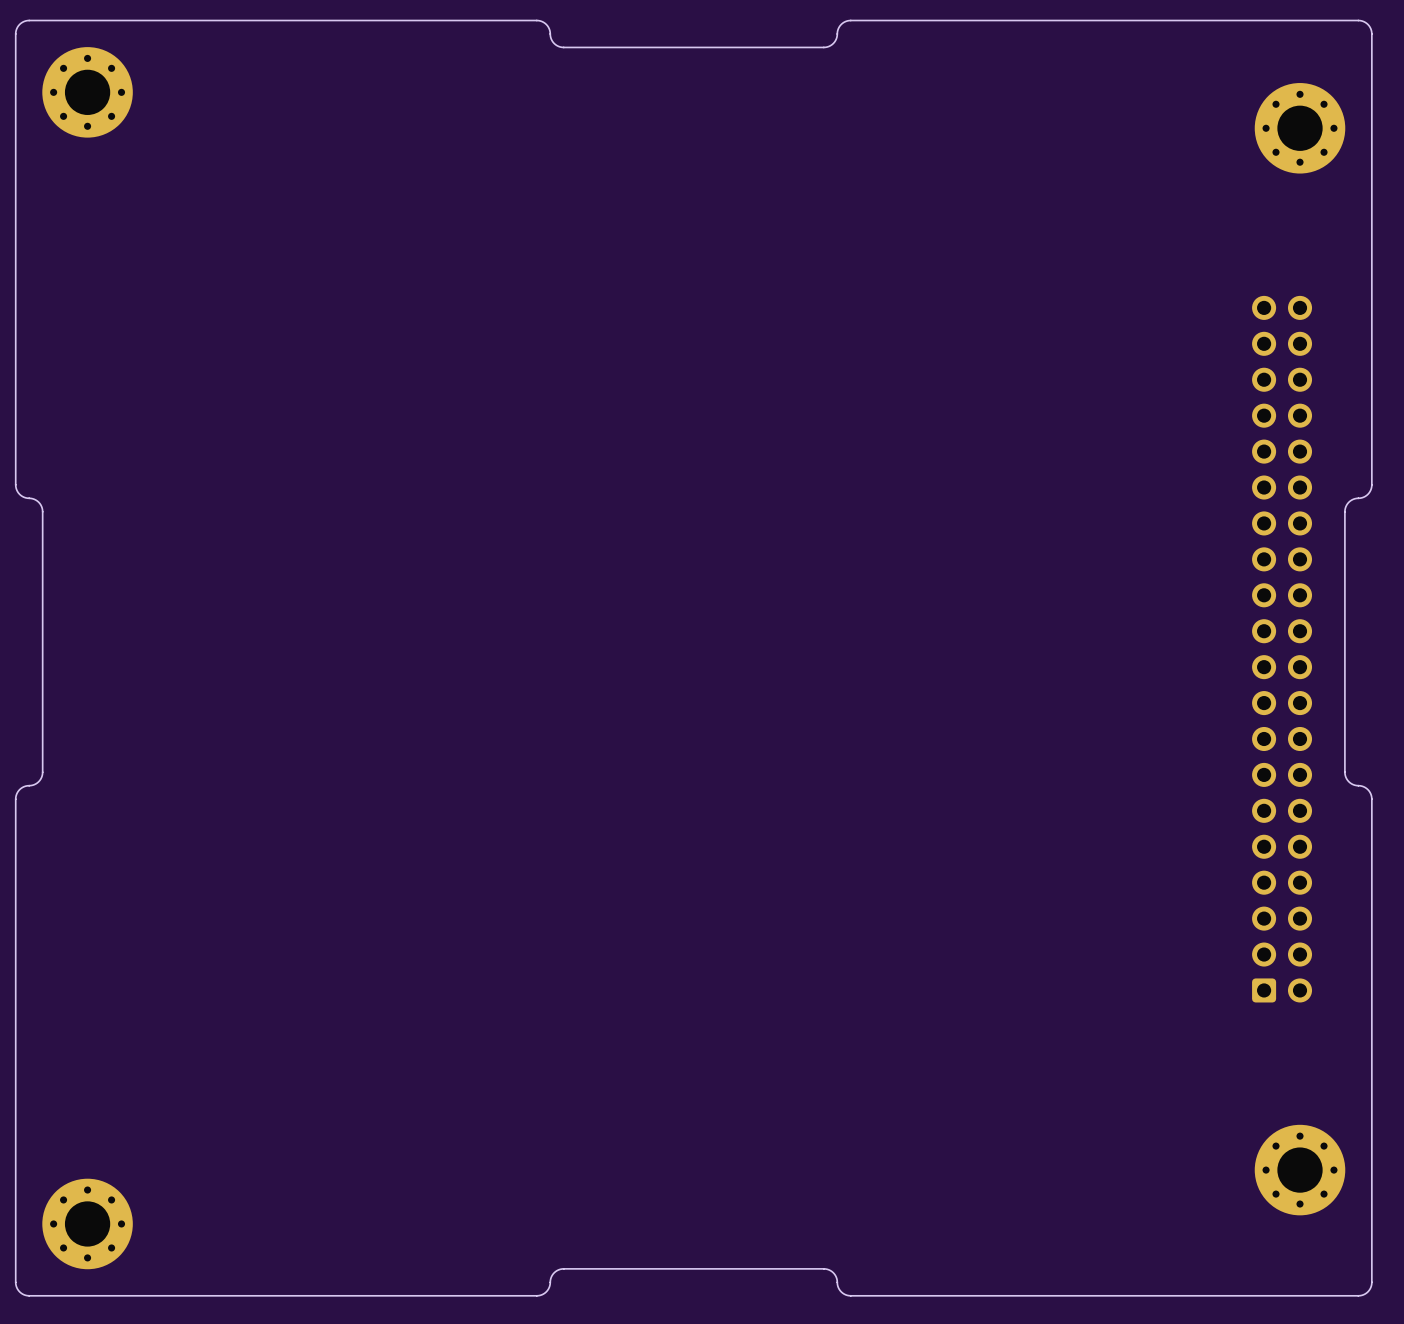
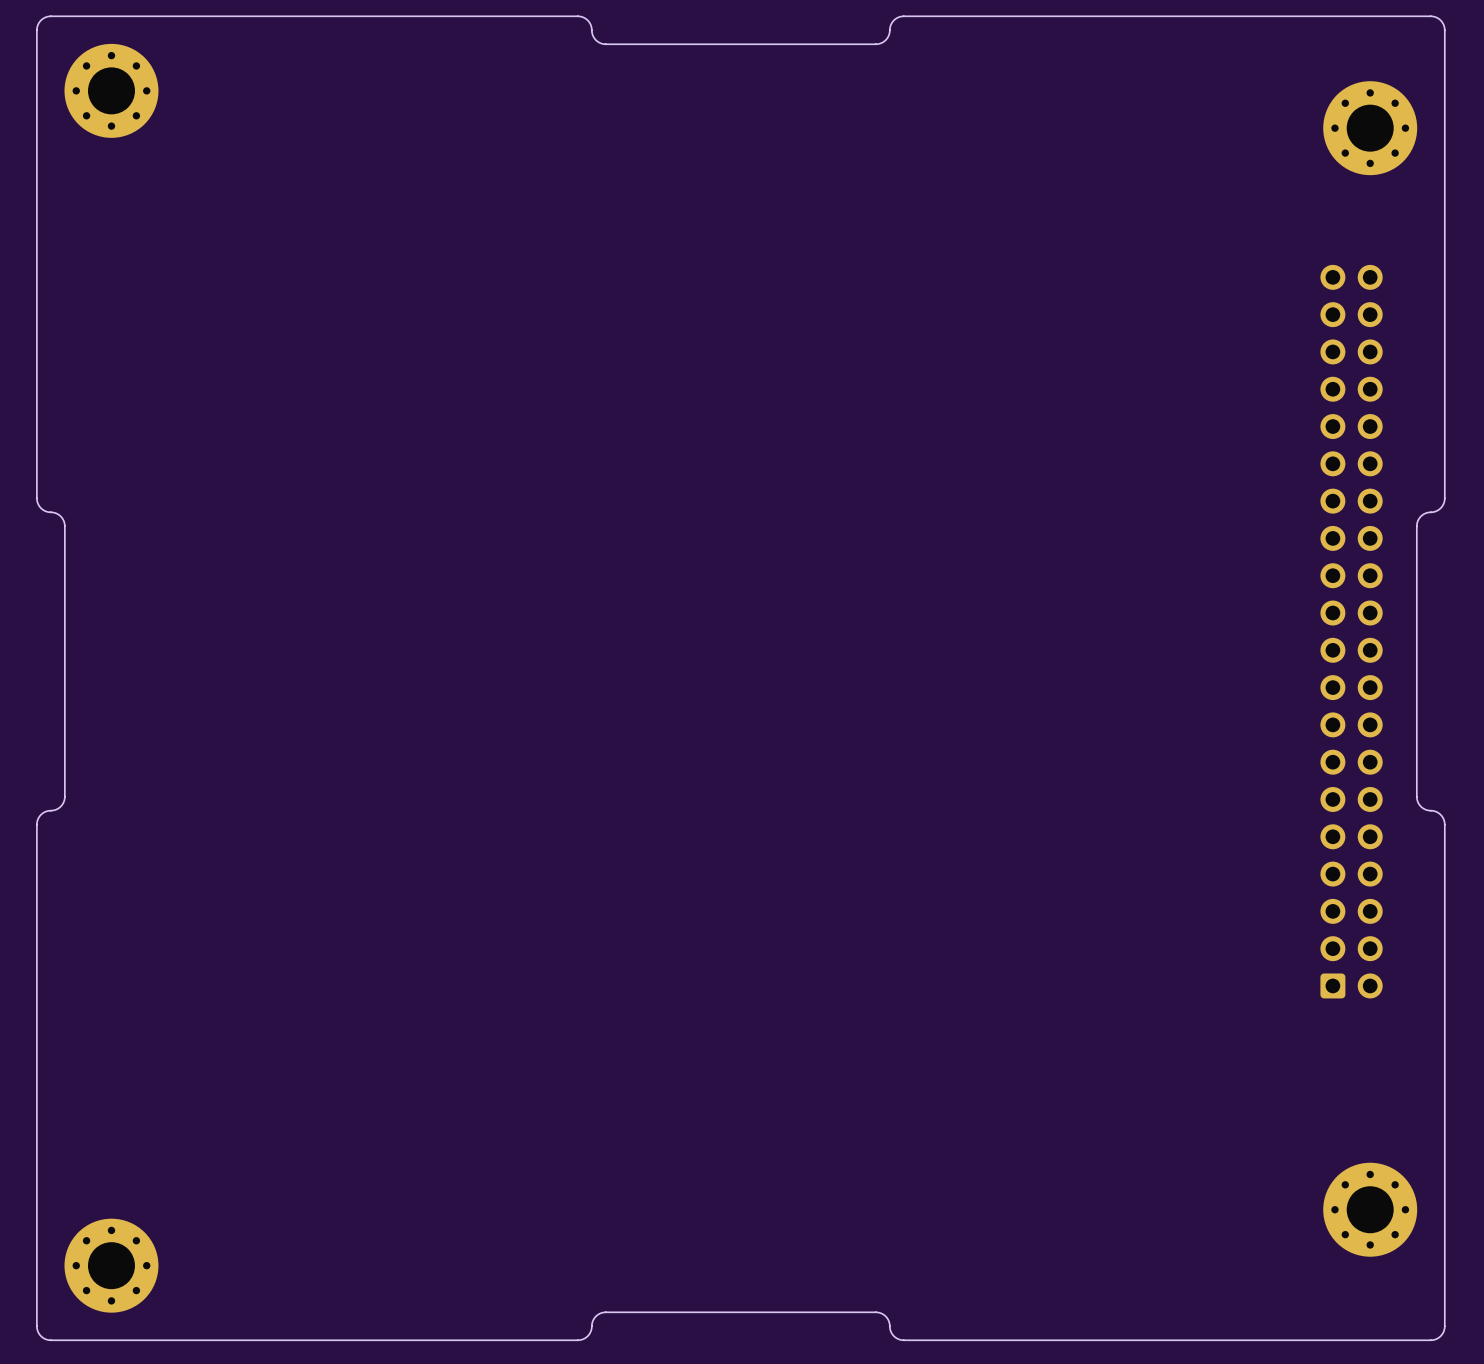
part position: (1282, 649) -> (1351, 631)

